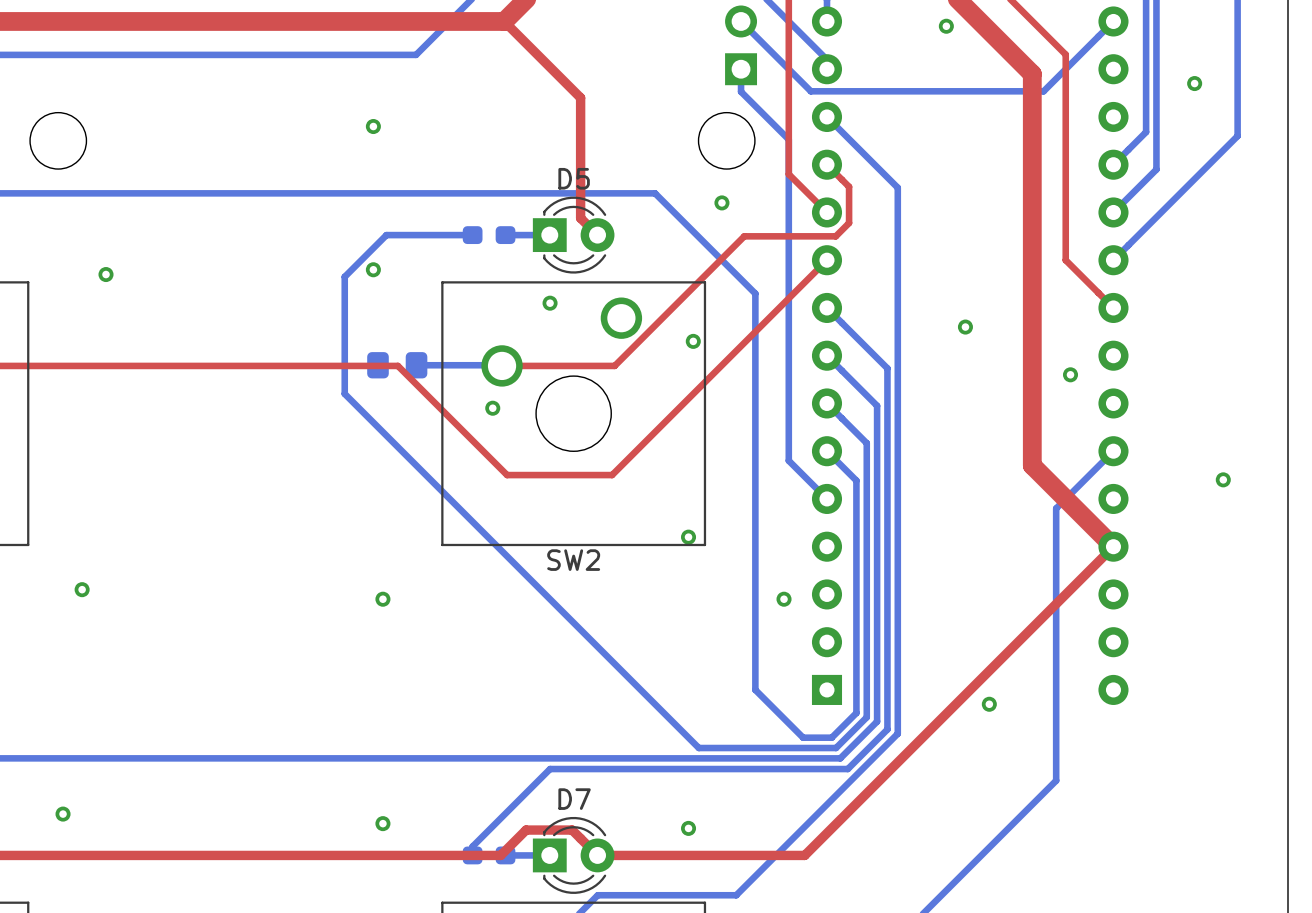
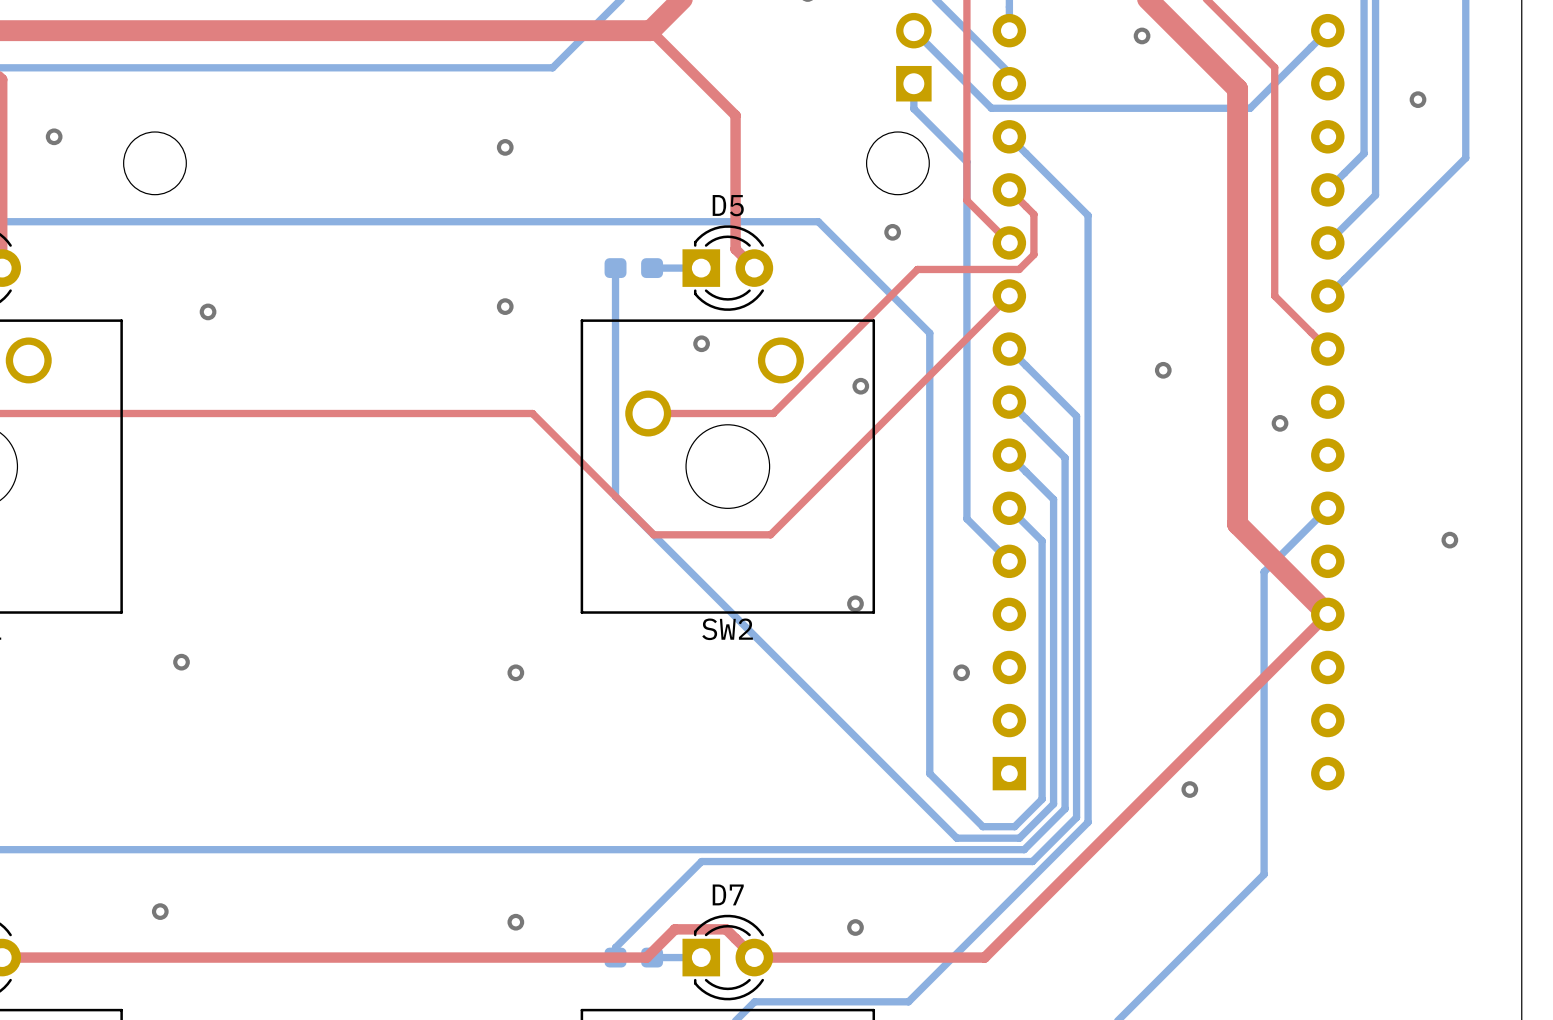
bottom track: (472, 235) (386, 235) (344, 276) (344, 393) (698, 748) (779, 748) -> (615, 268) (615, 496) (956, 838)
part: (397, 365) -> none
bottom track: (416, 365) (502, 365) -> none
via: (492, 408) -> none

